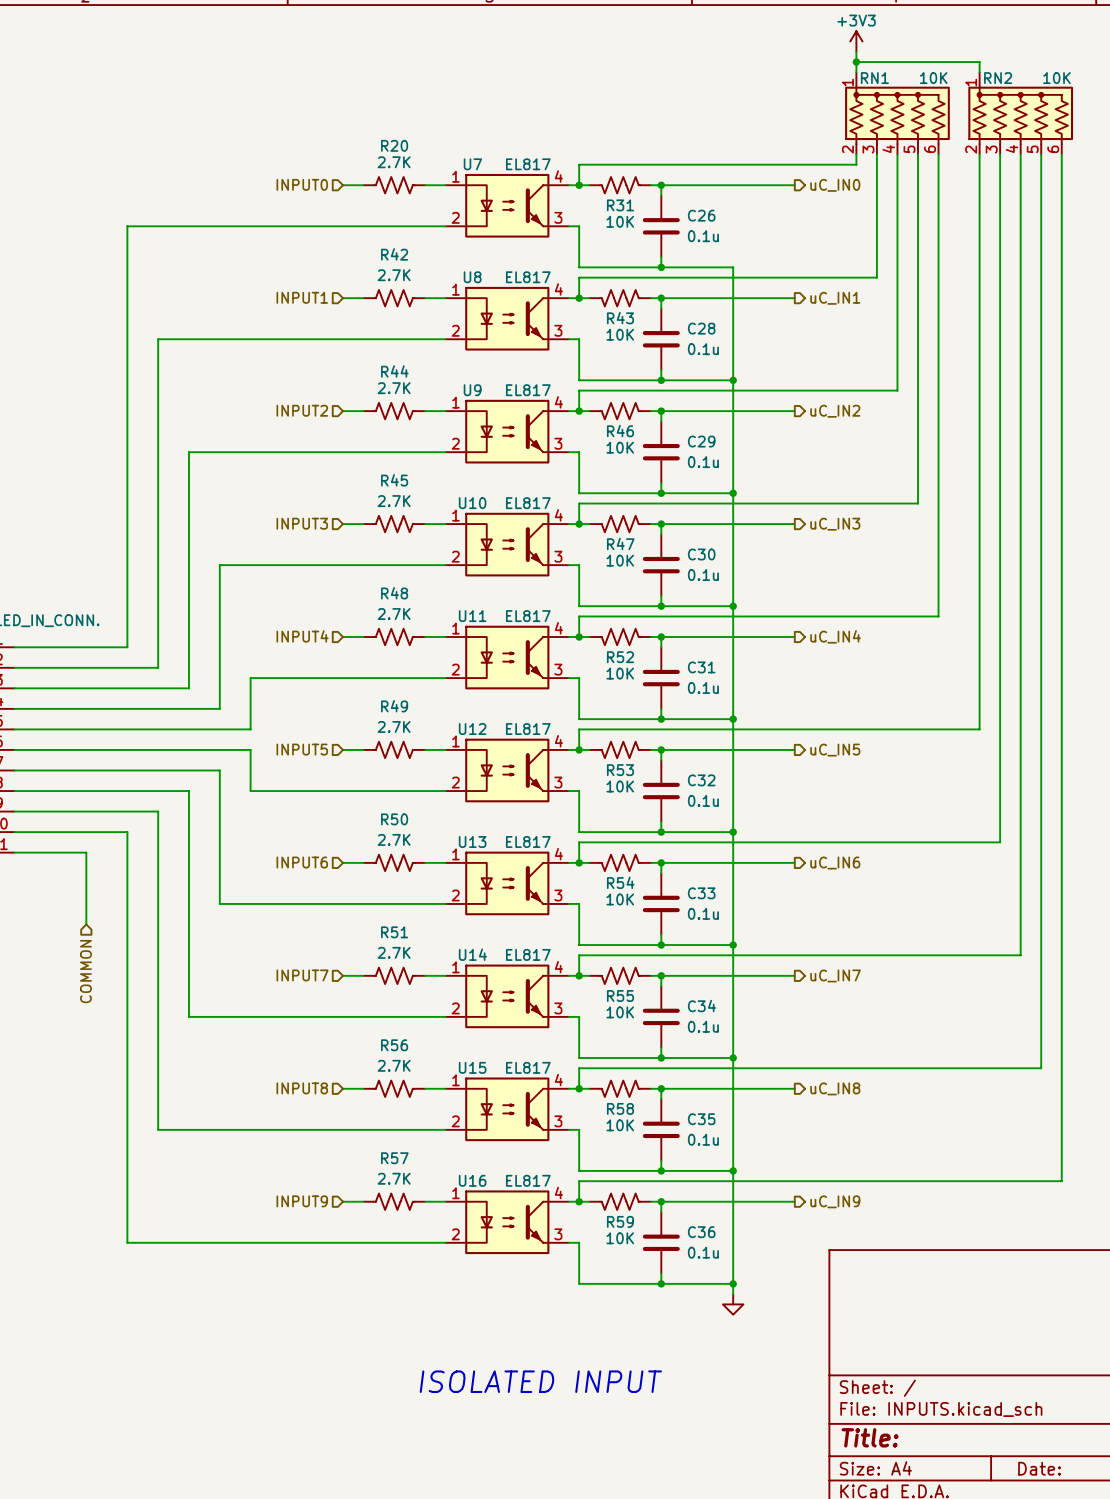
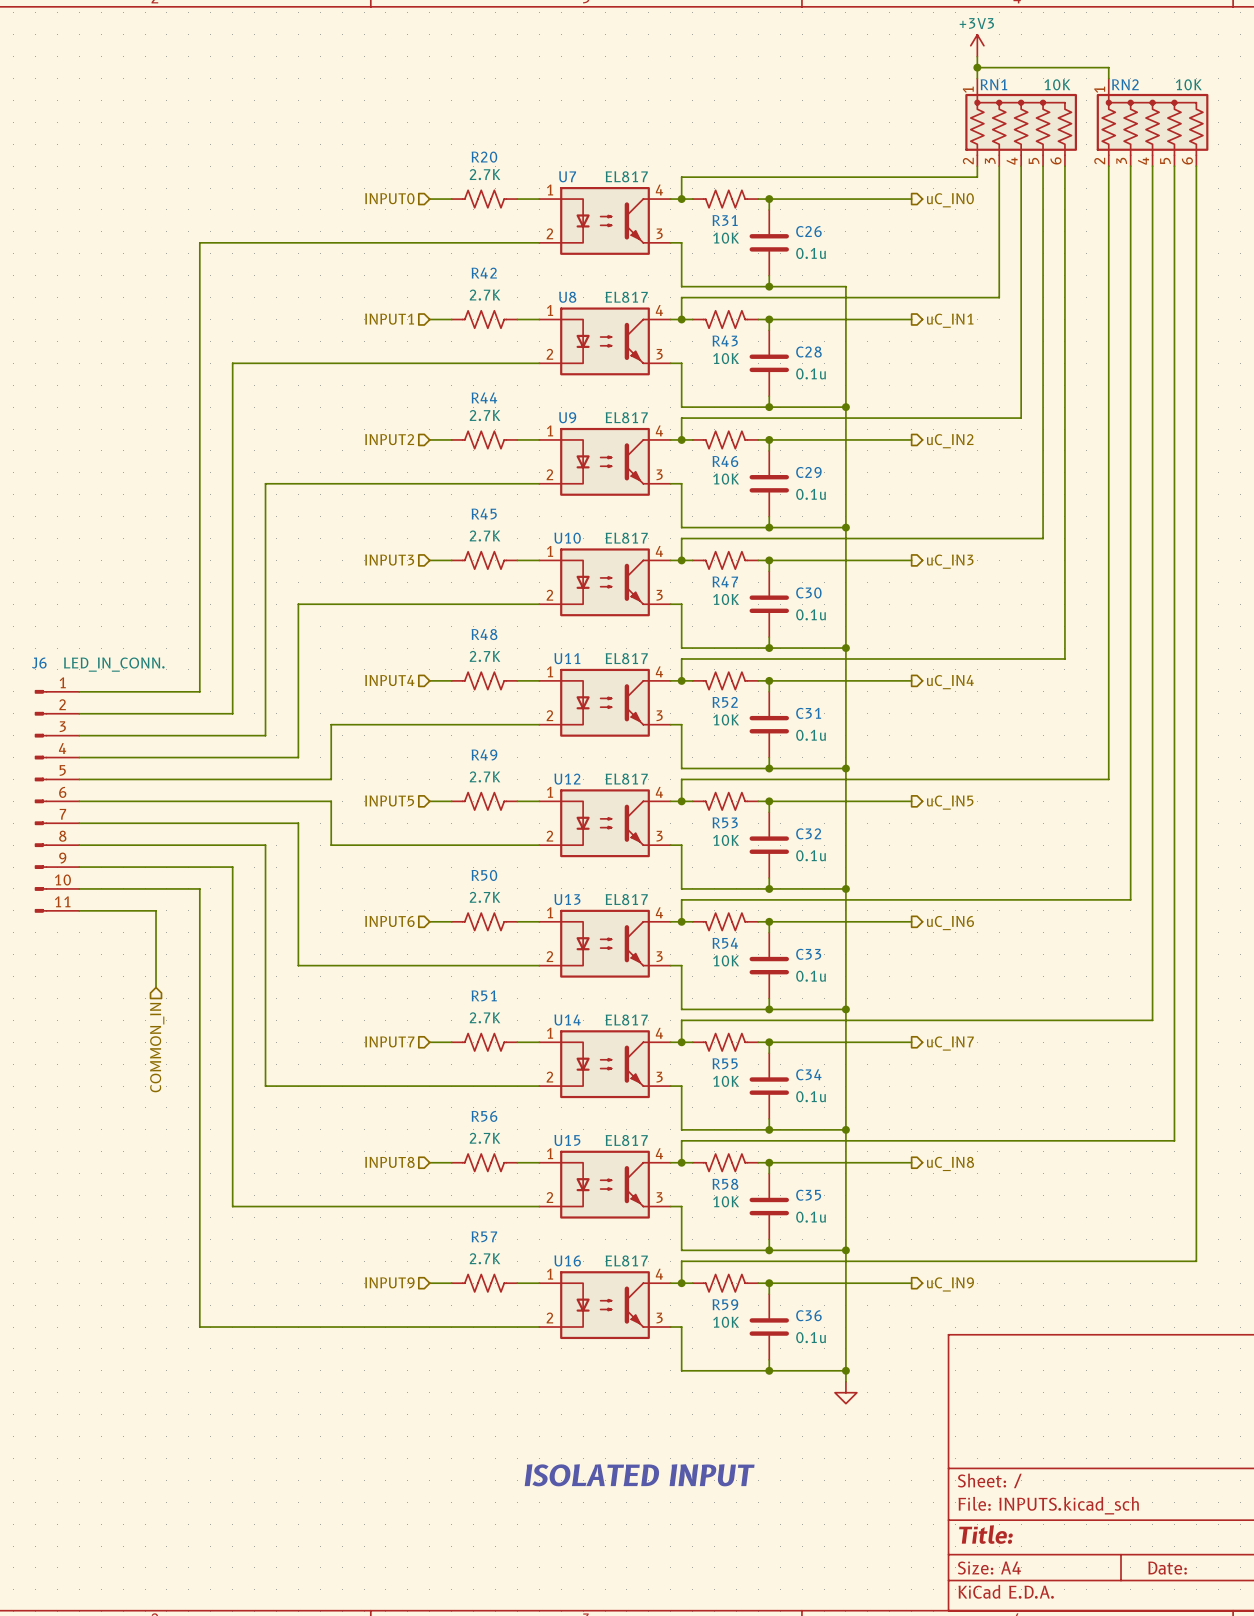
hierarchical label: COMMON (85, 971) -> COMMON_IN (157, 1047)

